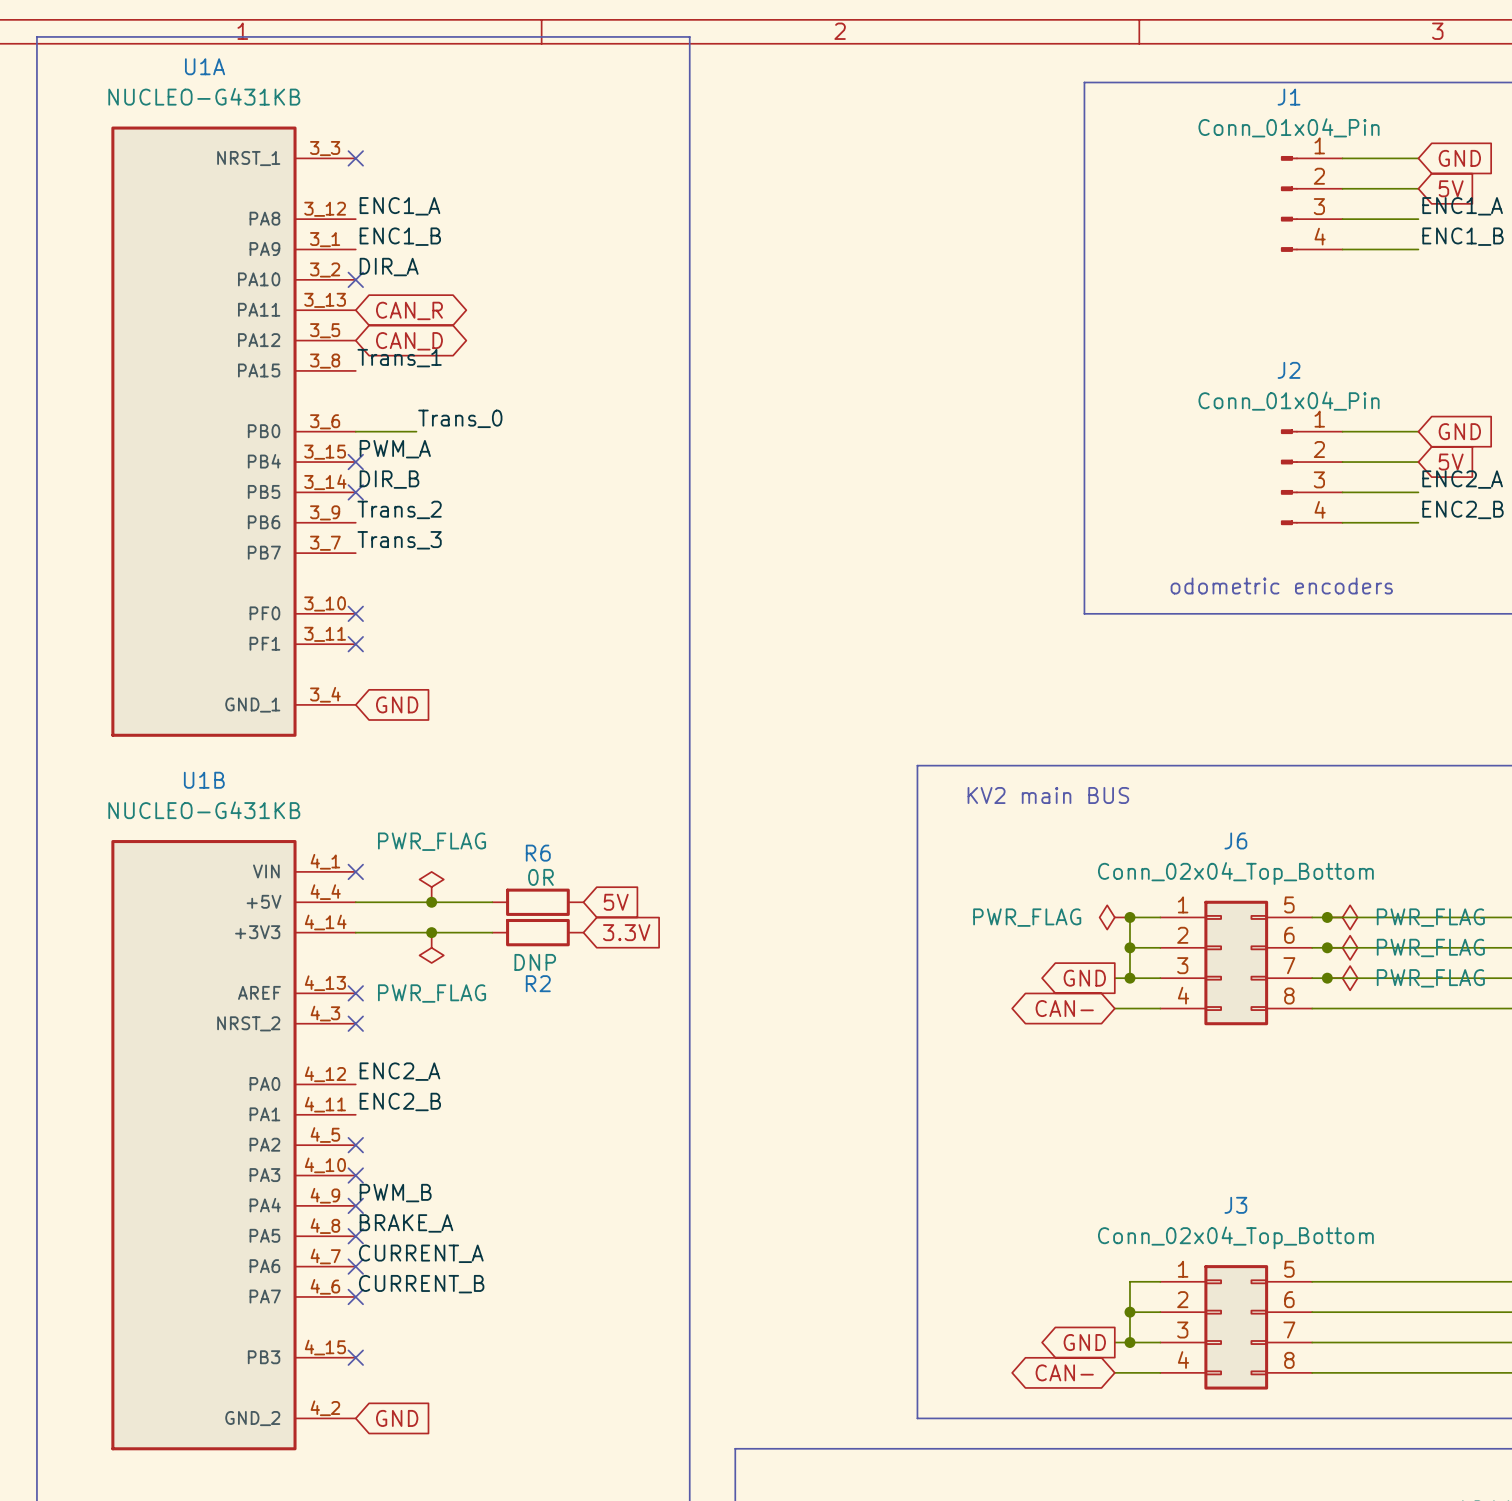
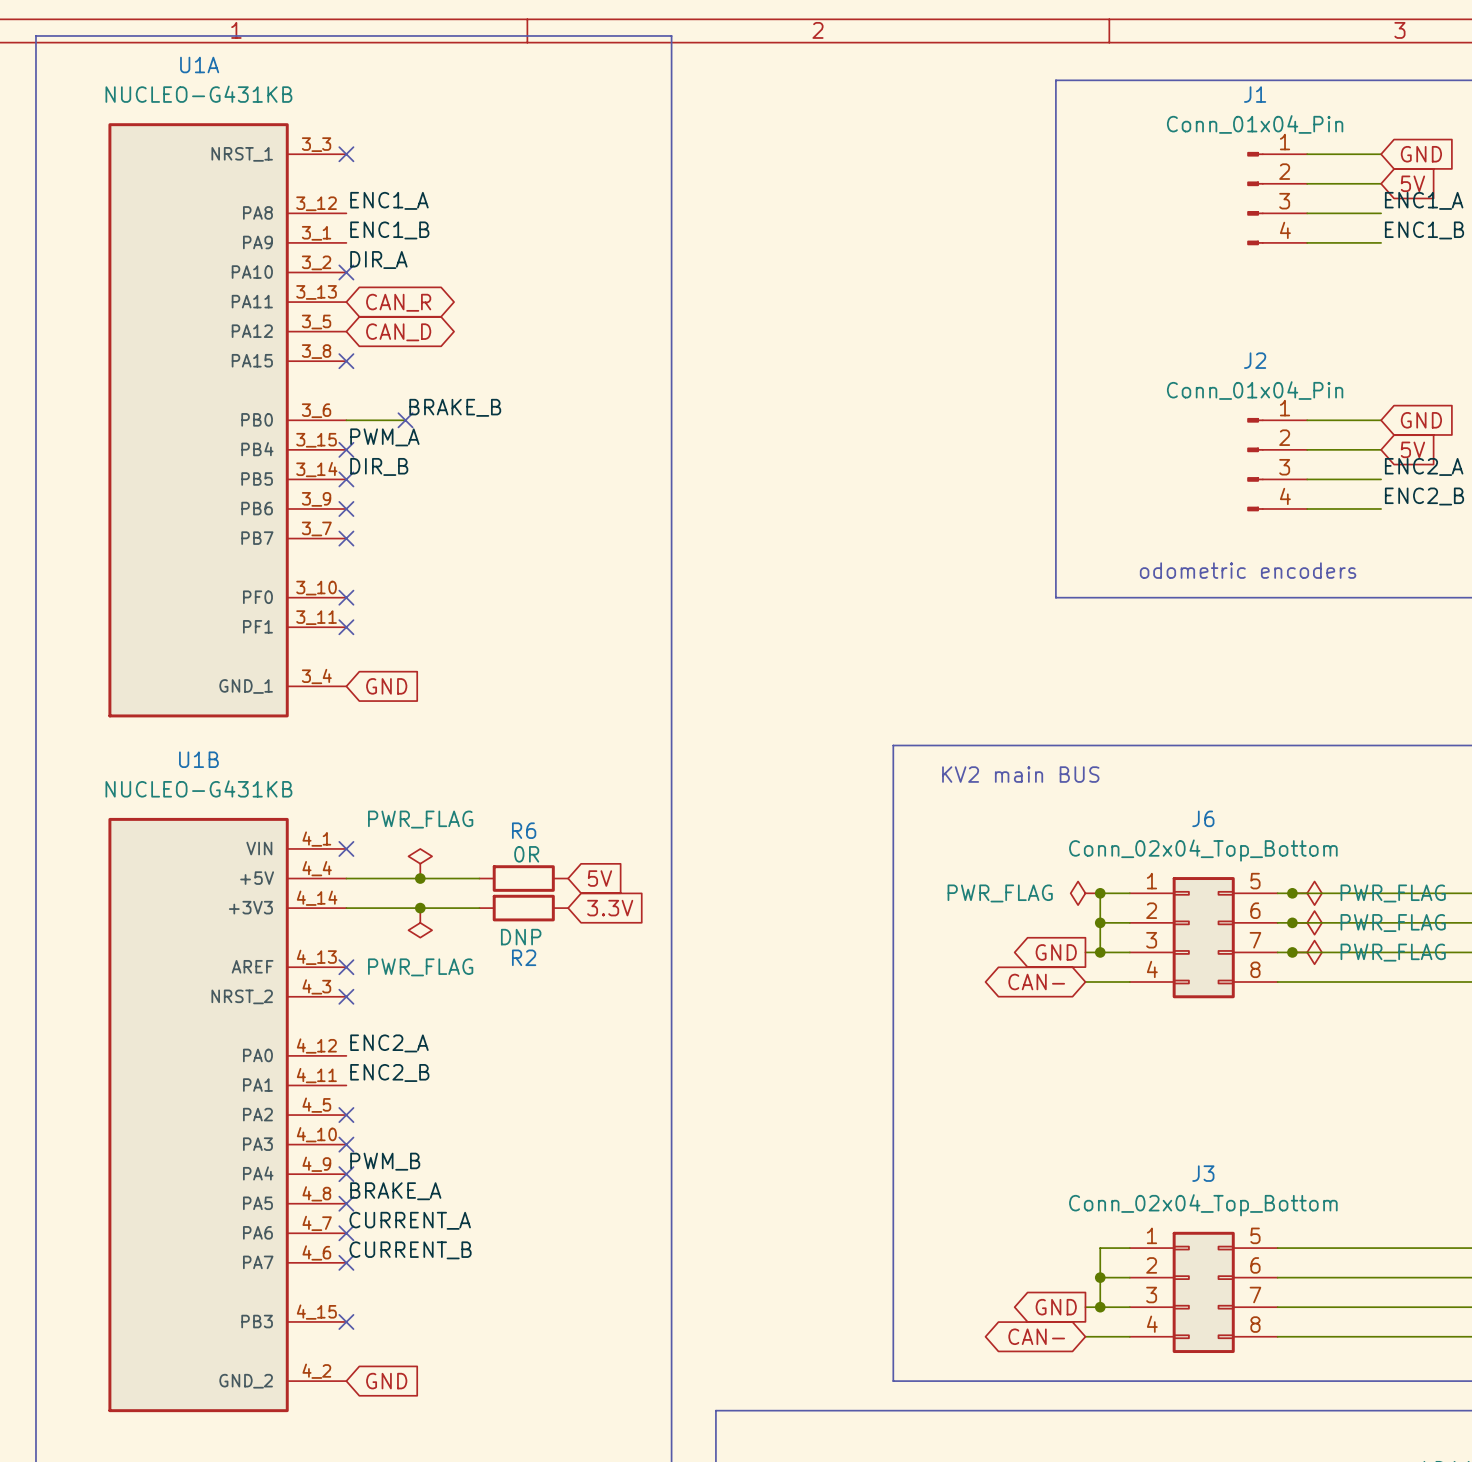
label: Trans_1 (399, 358) -> none
no-connect mark: none -> (346, 361)
label: Trans_0 (460, 418) -> BRAKE_B (455, 407)
no-connect mark: none -> (405, 420)
label: Trans_2 (399, 509) -> none
no-connect mark: none -> (346, 508)
label: Trans_3 (399, 540) -> none
no-connect mark: none -> (346, 538)

